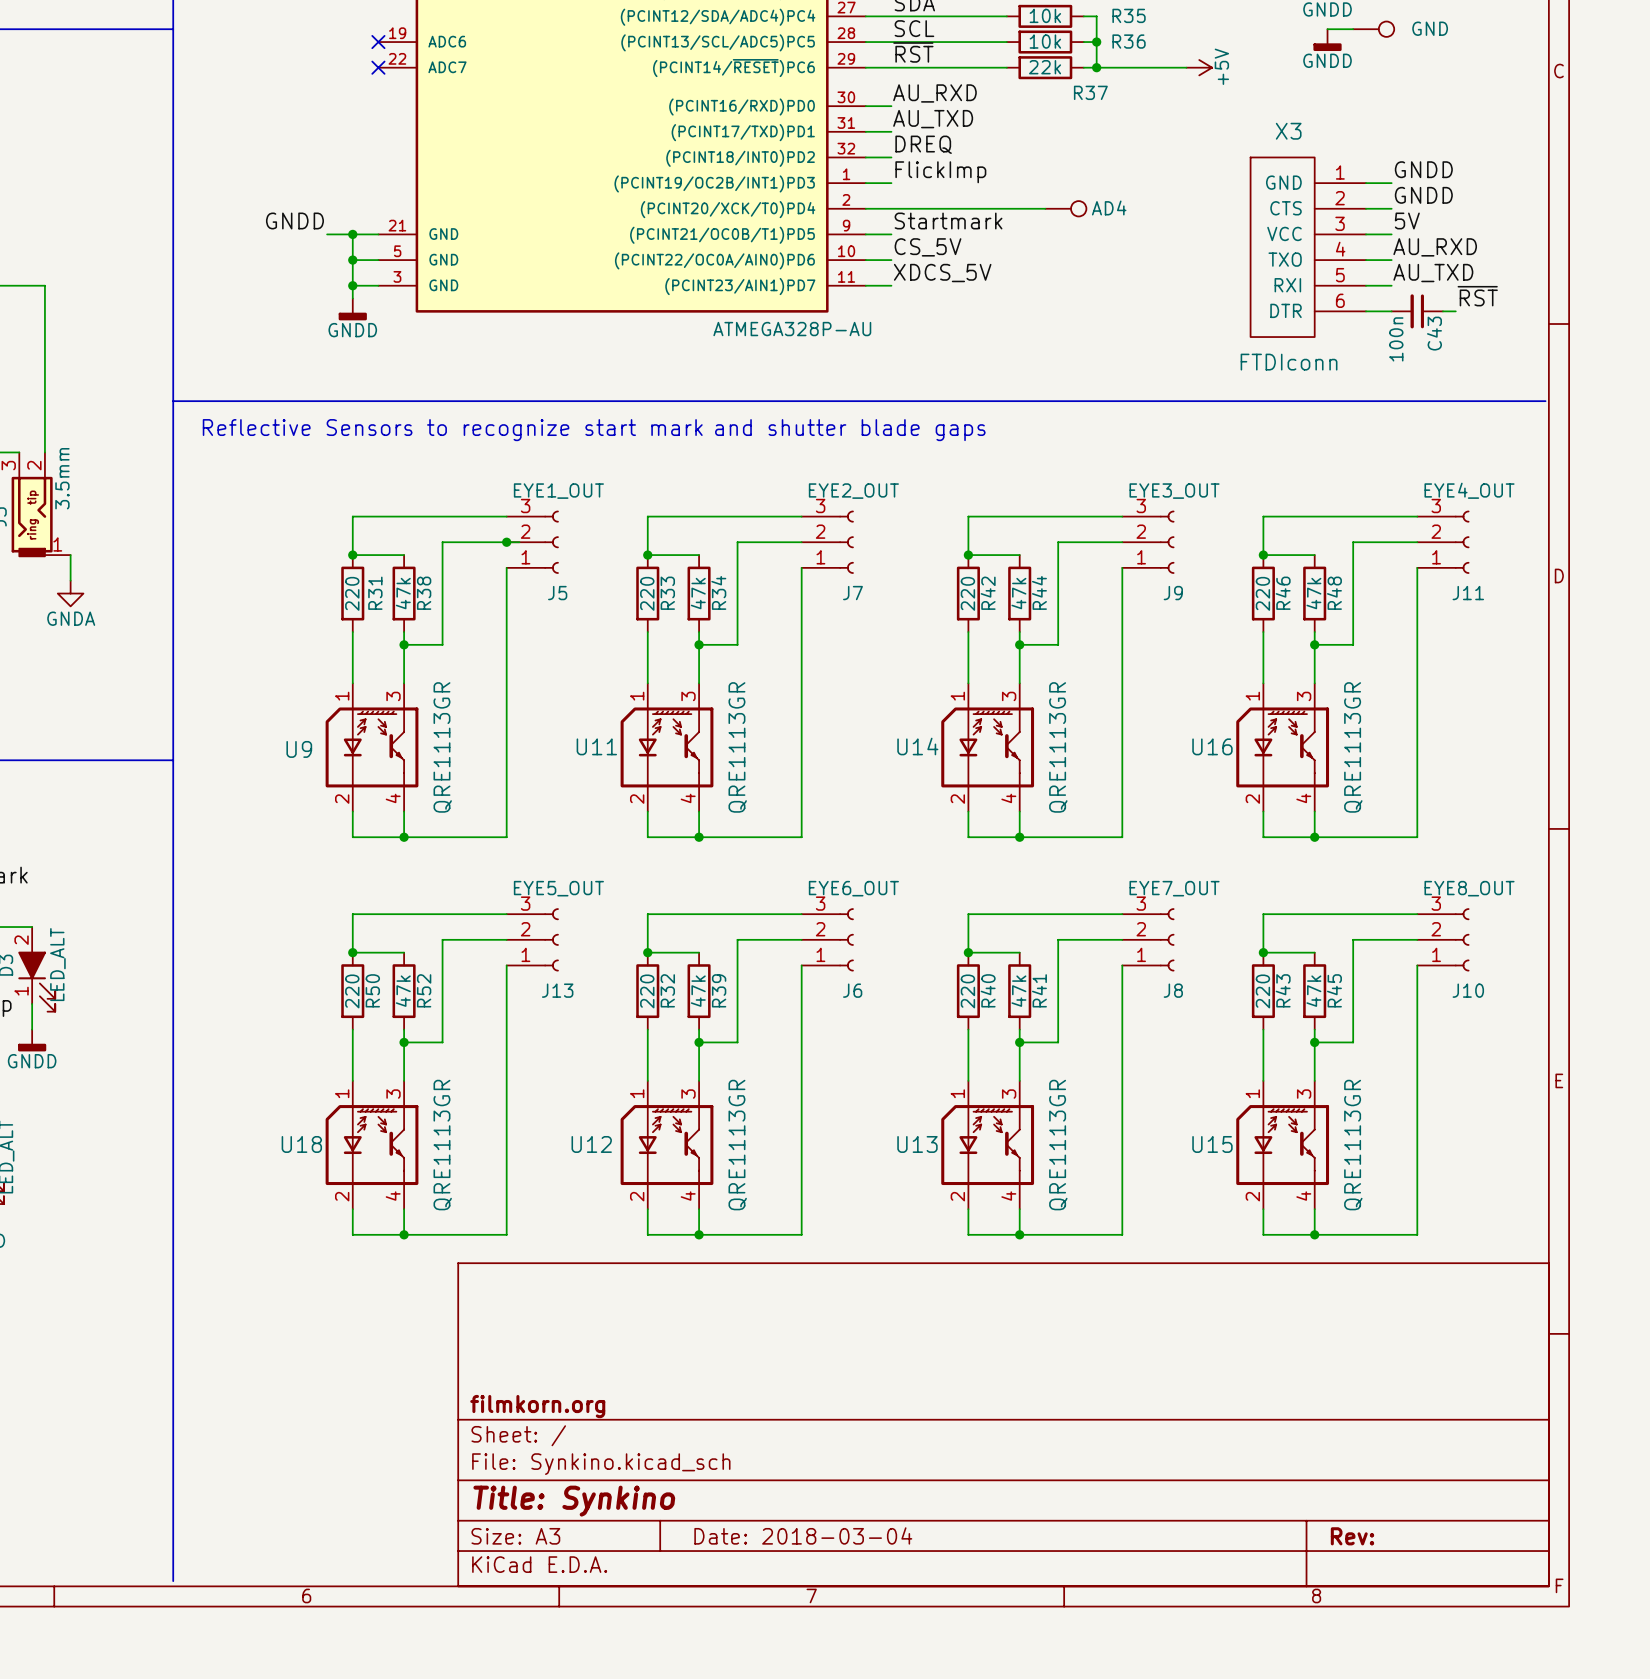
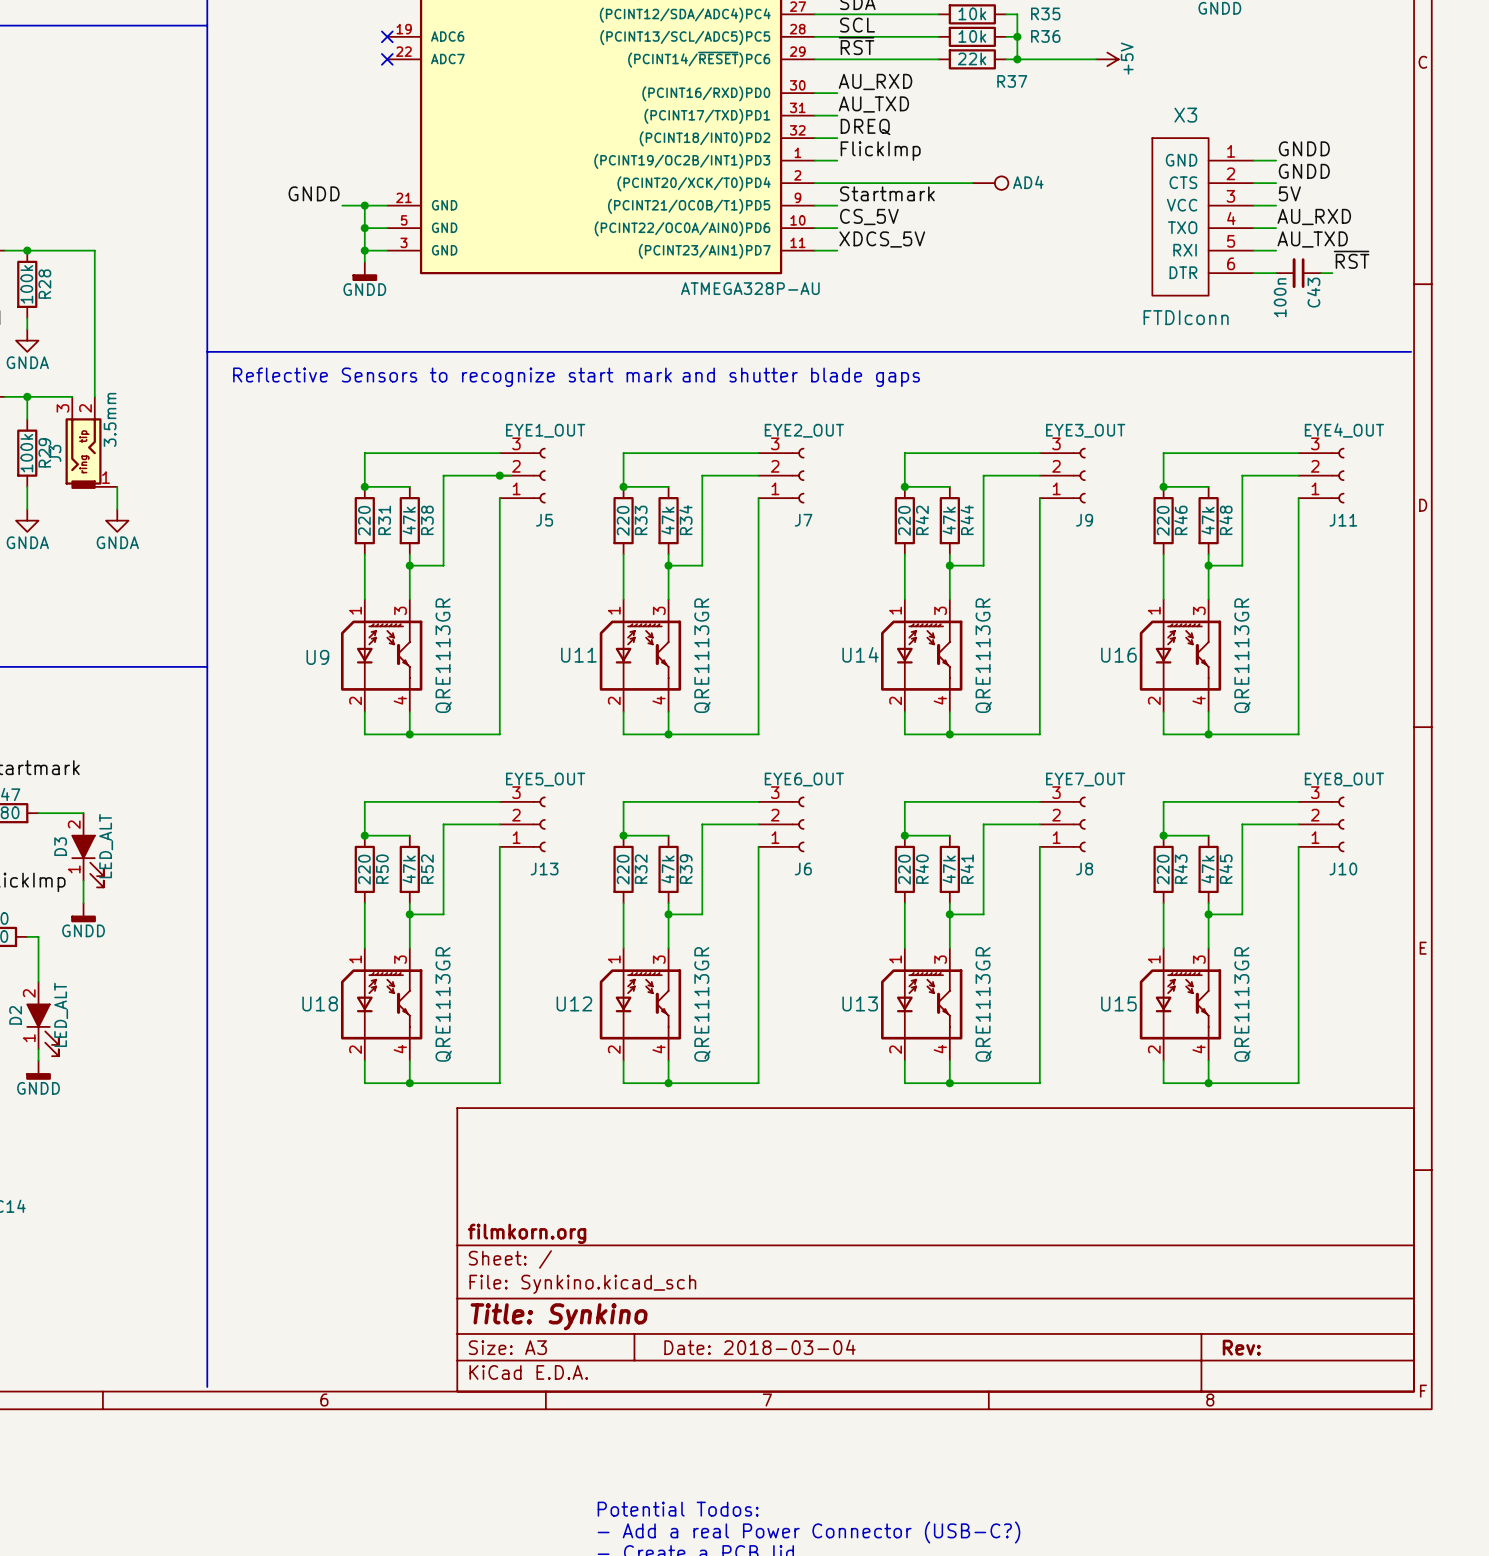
wire: (1327, 29) (1353, 29) -> none
part: GND (1373, 29) -> none
power symbol: GNDD (1327, 40) -> none

